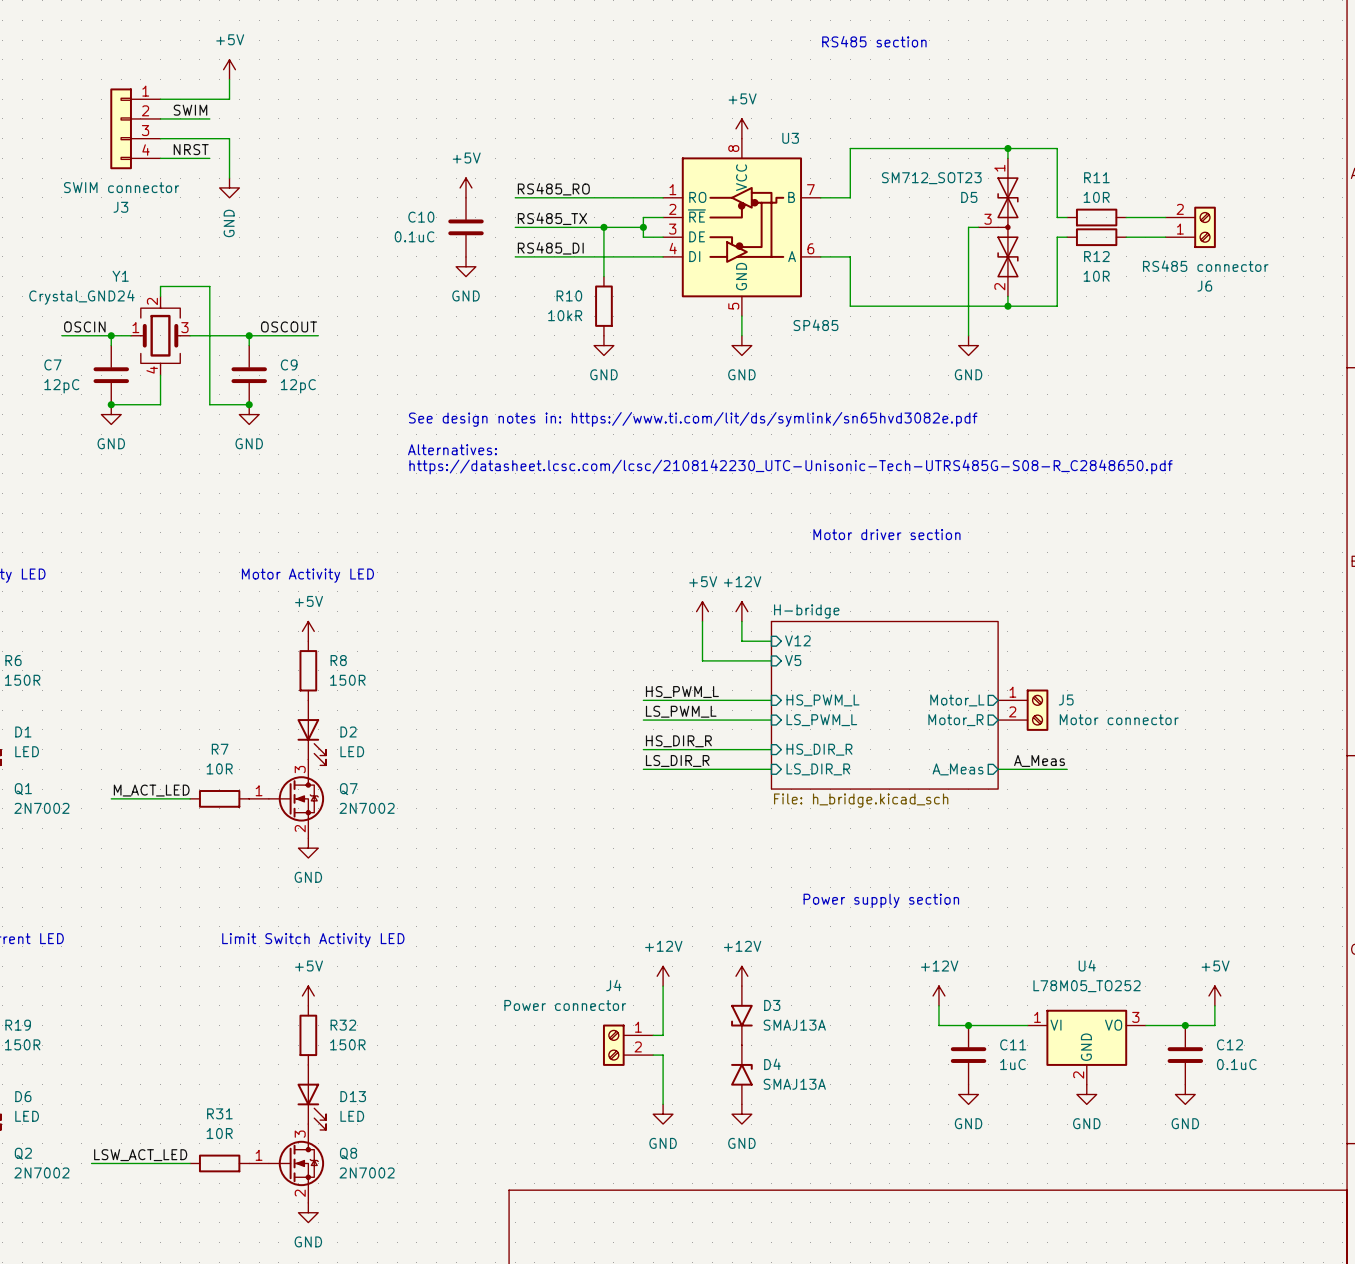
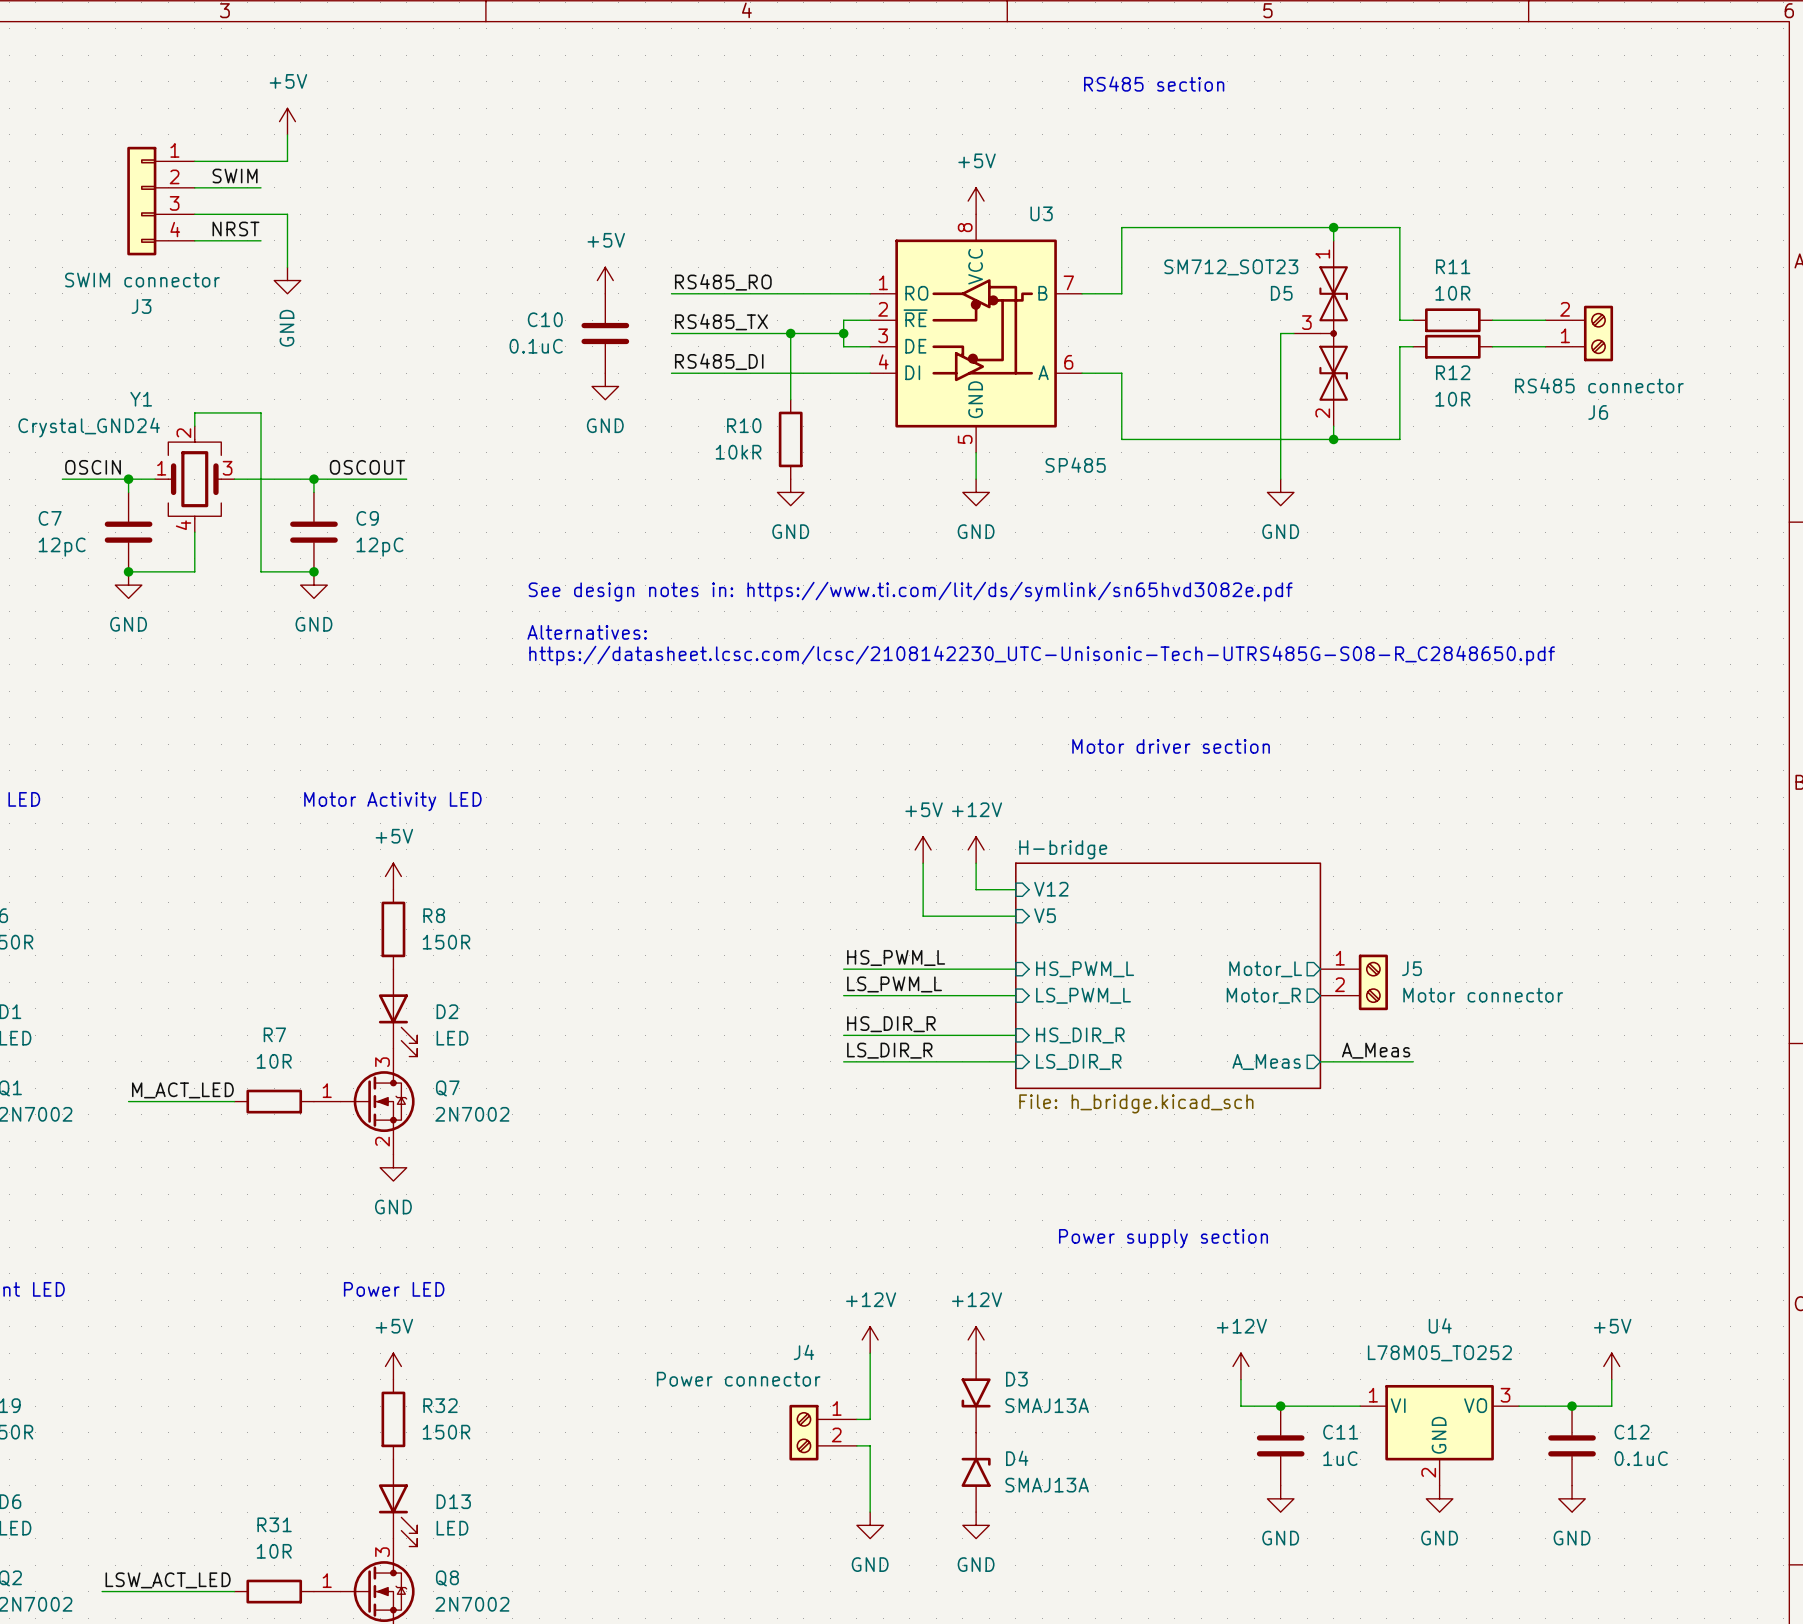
text: none -> Power LED (394, 1289)
text: Limit Switch Activity LED (313, 940) -> none

